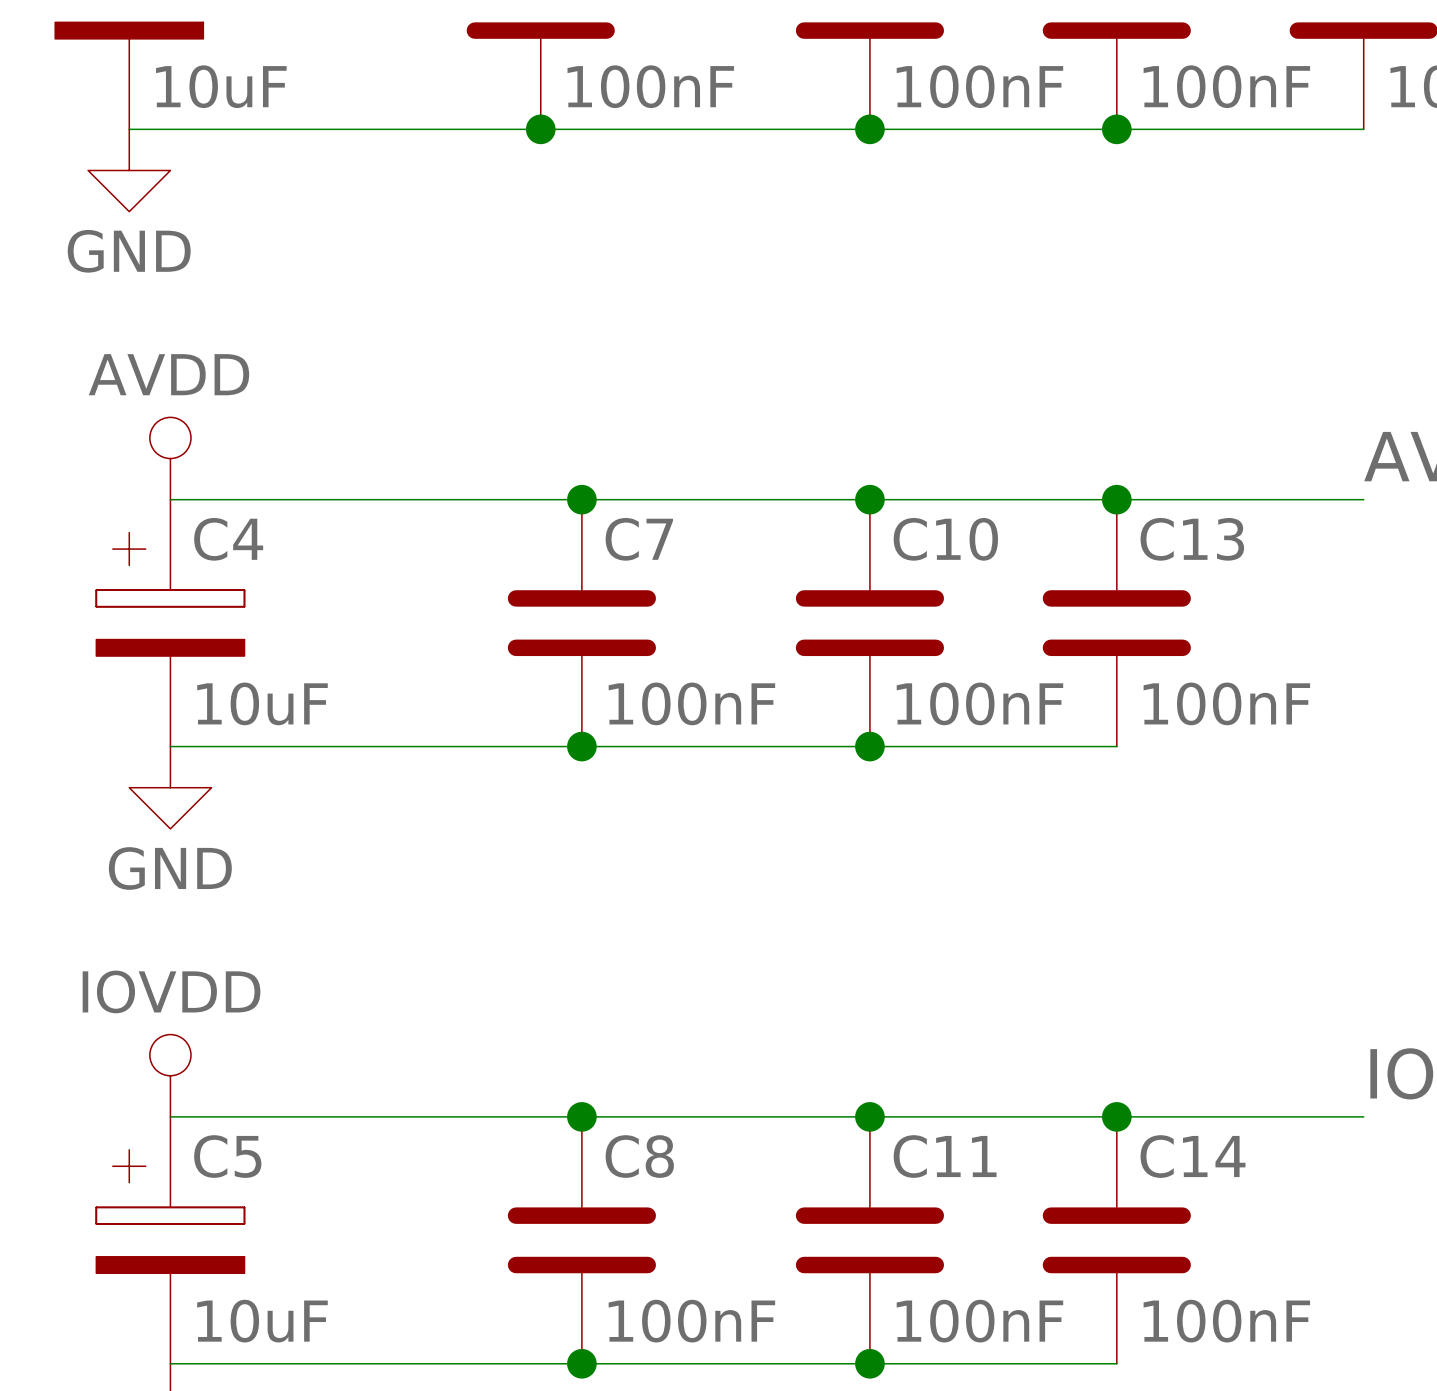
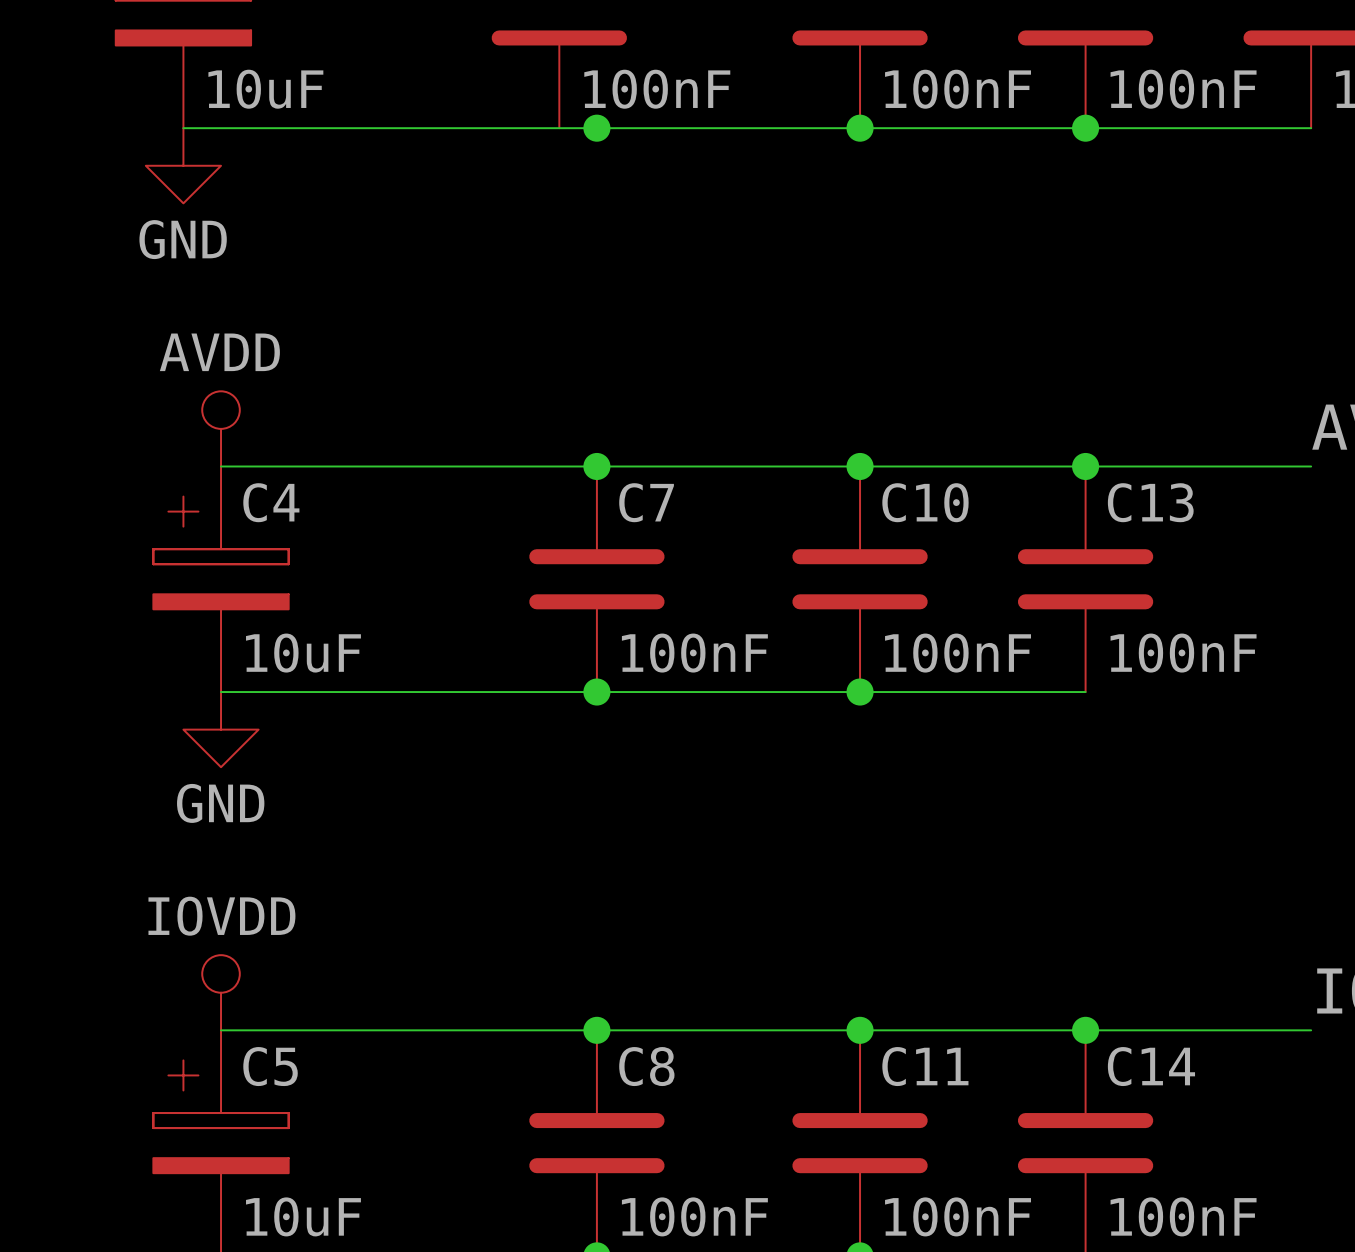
junction position: (540, 129) -> (596, 128)

